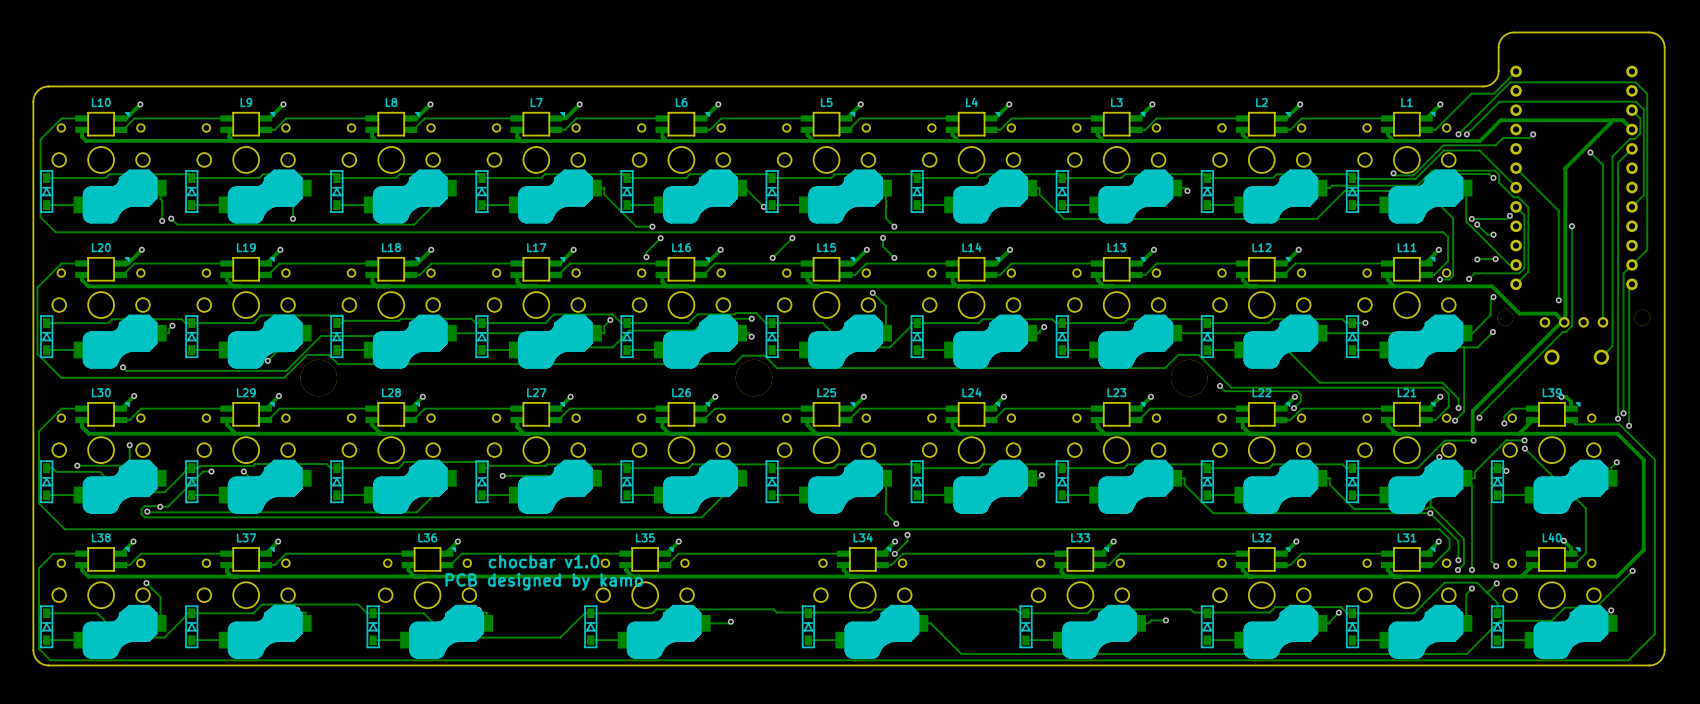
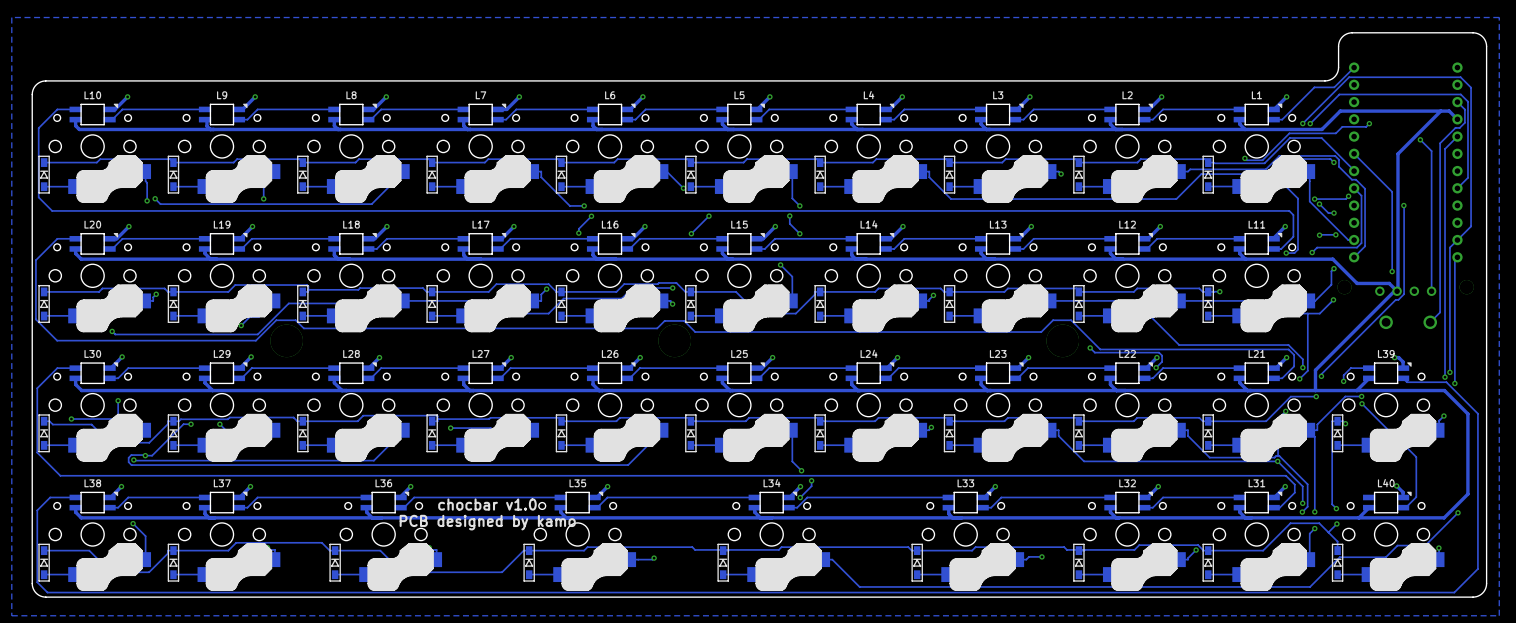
zone outline: none -> (1499, 17) (1499, 615) (11, 615) (11, 17) (1499, 17)

